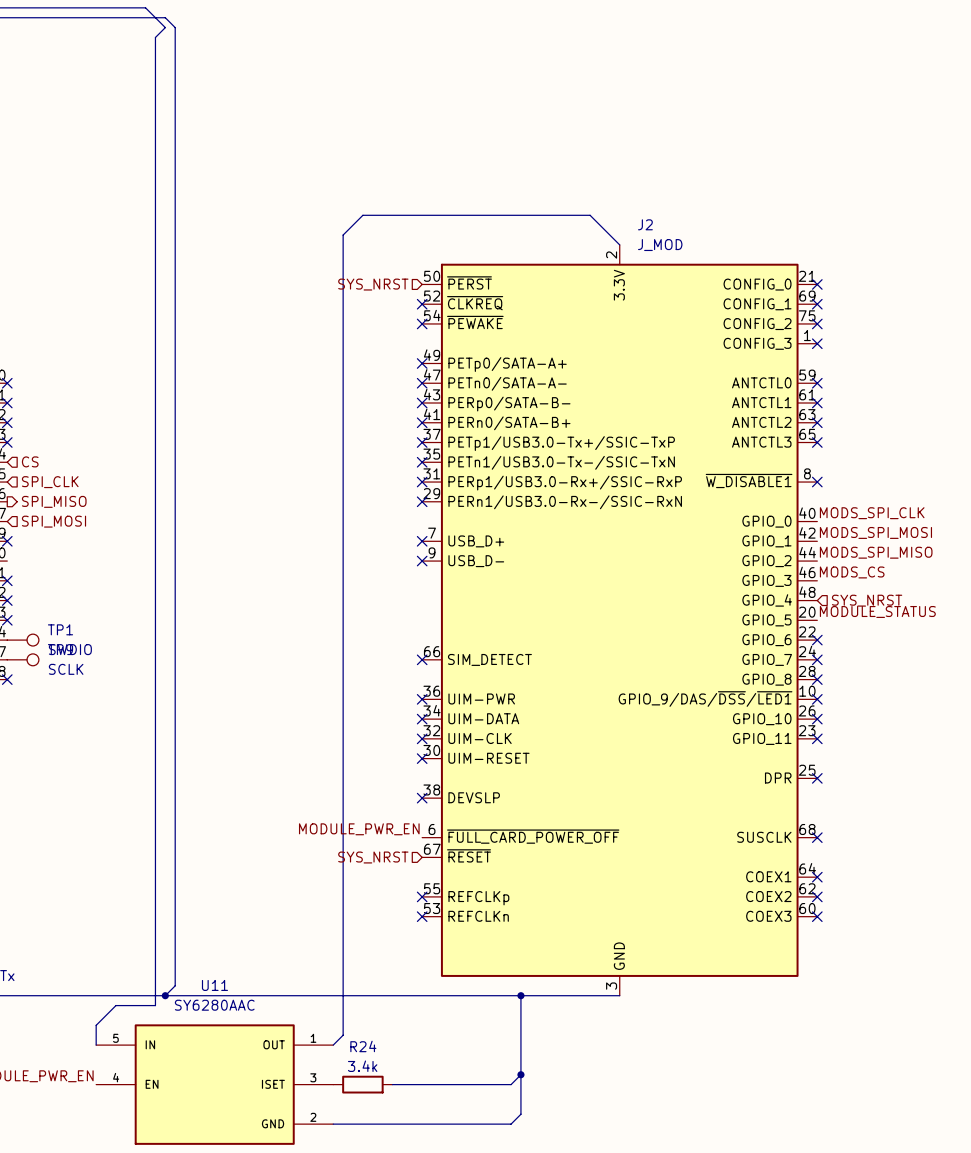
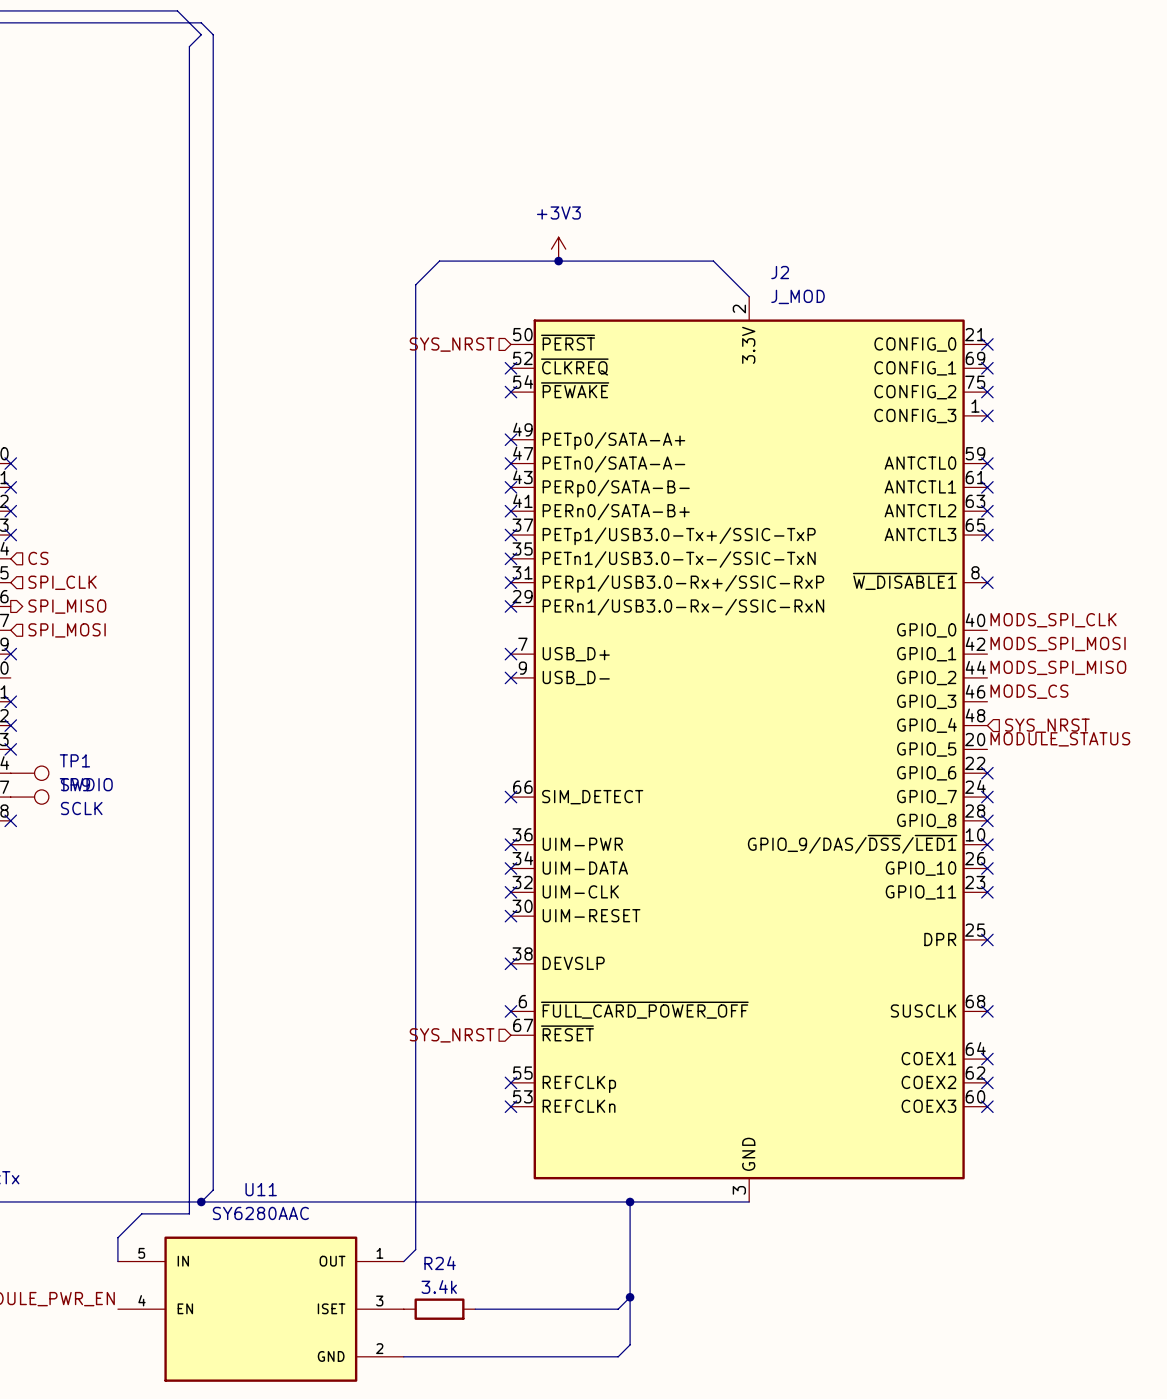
power symbol: none -> +3V3 (558, 249)
junction: none -> (558, 261)
label: MODULE_PWR_EN (359, 829) -> none
no-connect mark: none -> (510, 1011)

